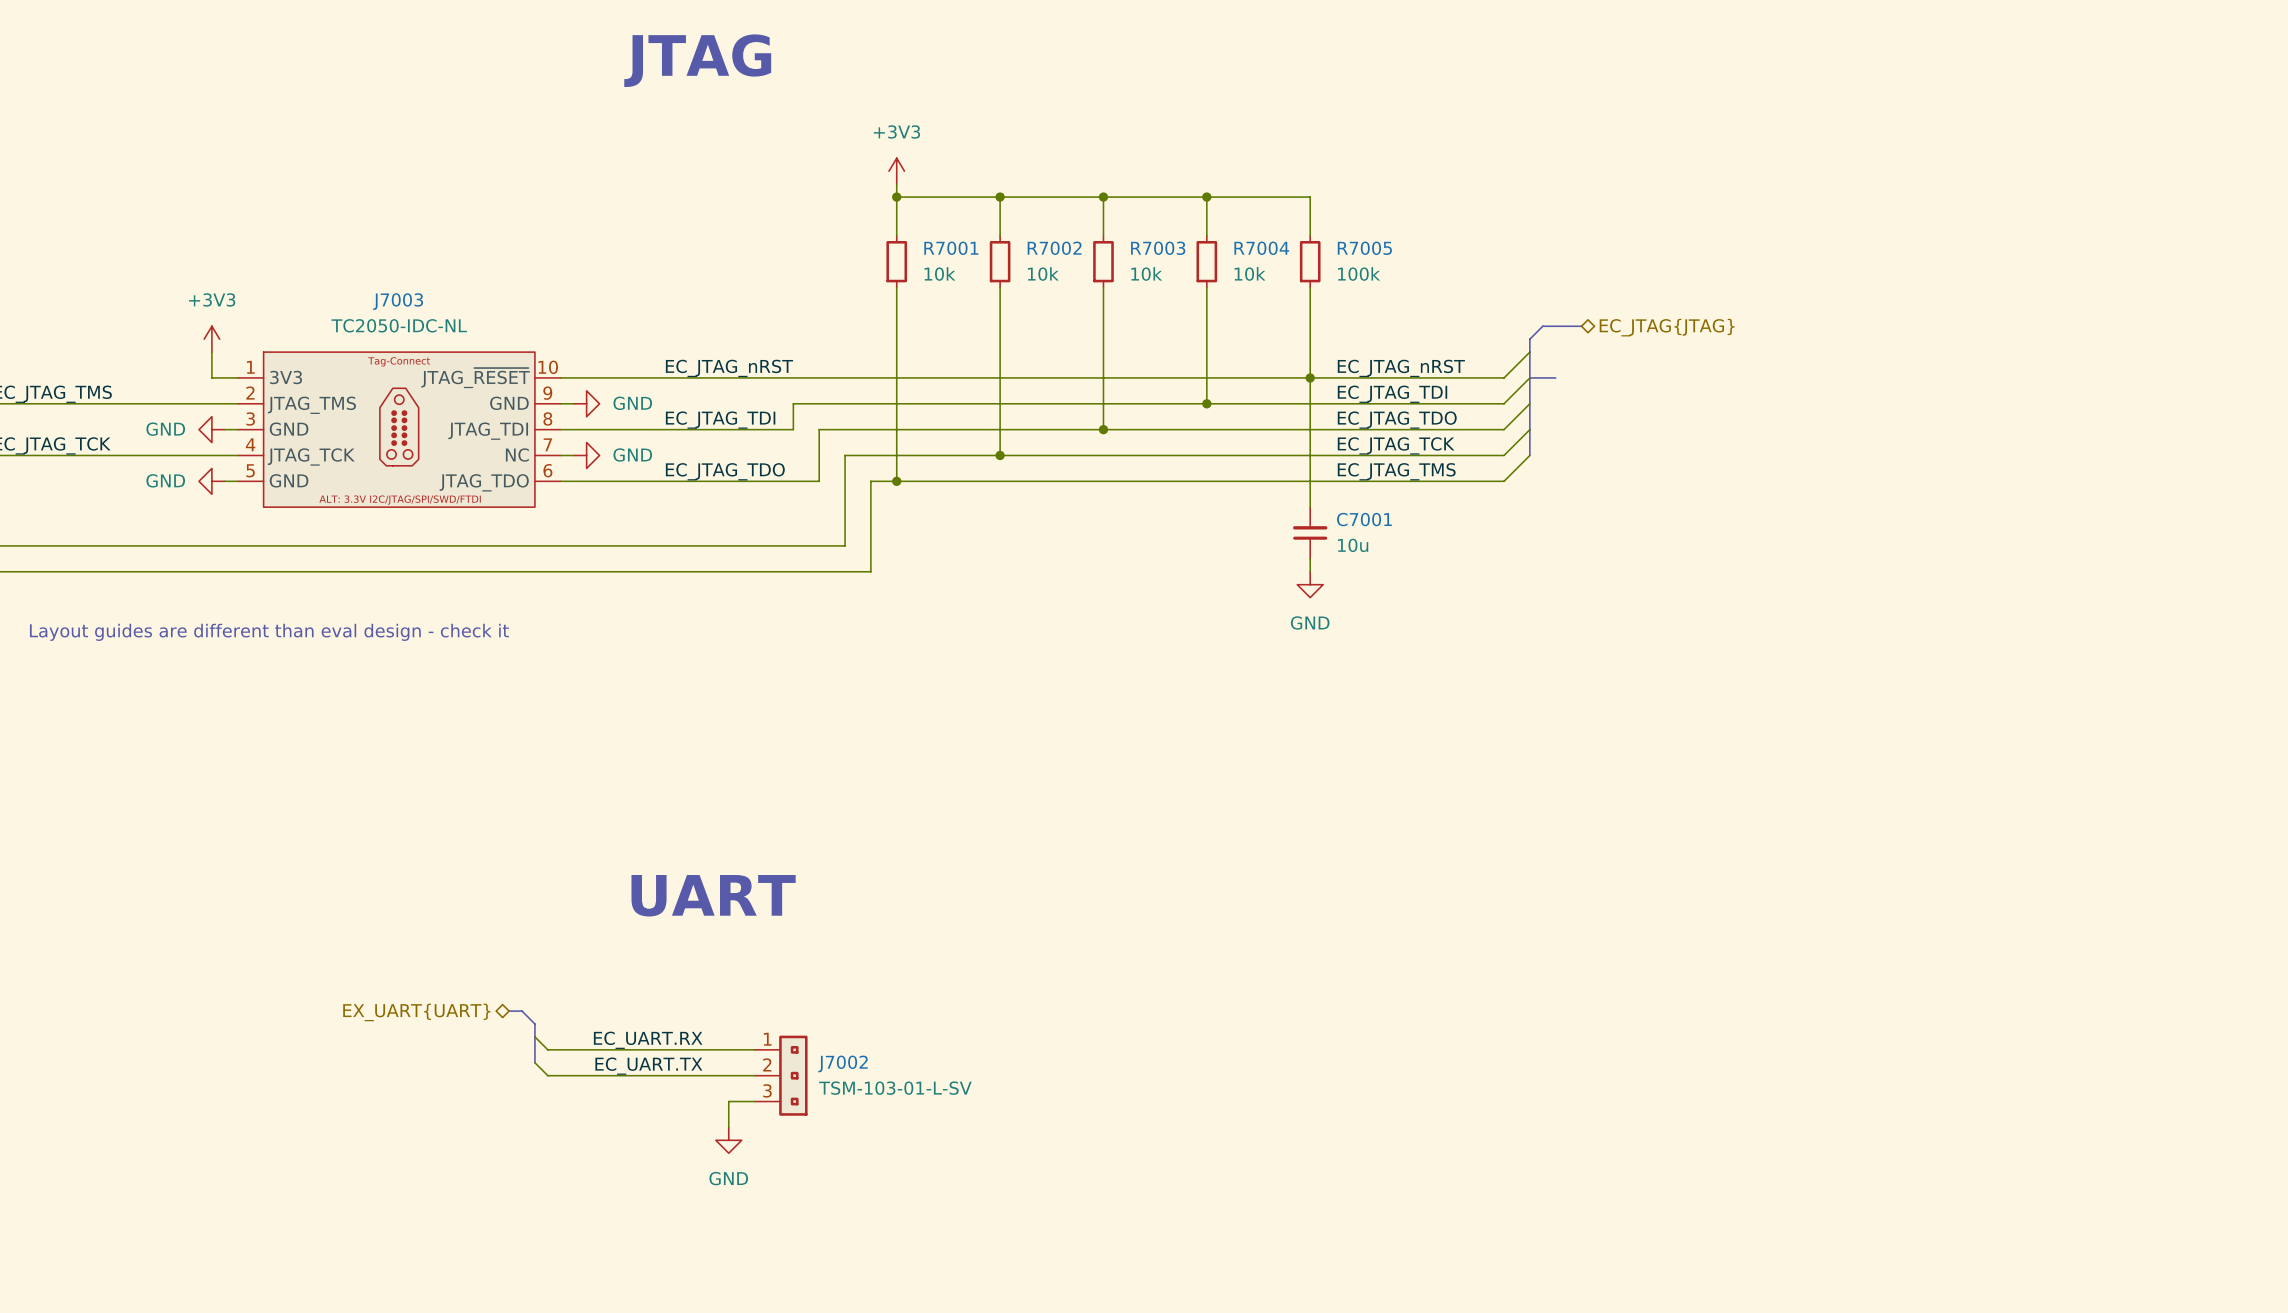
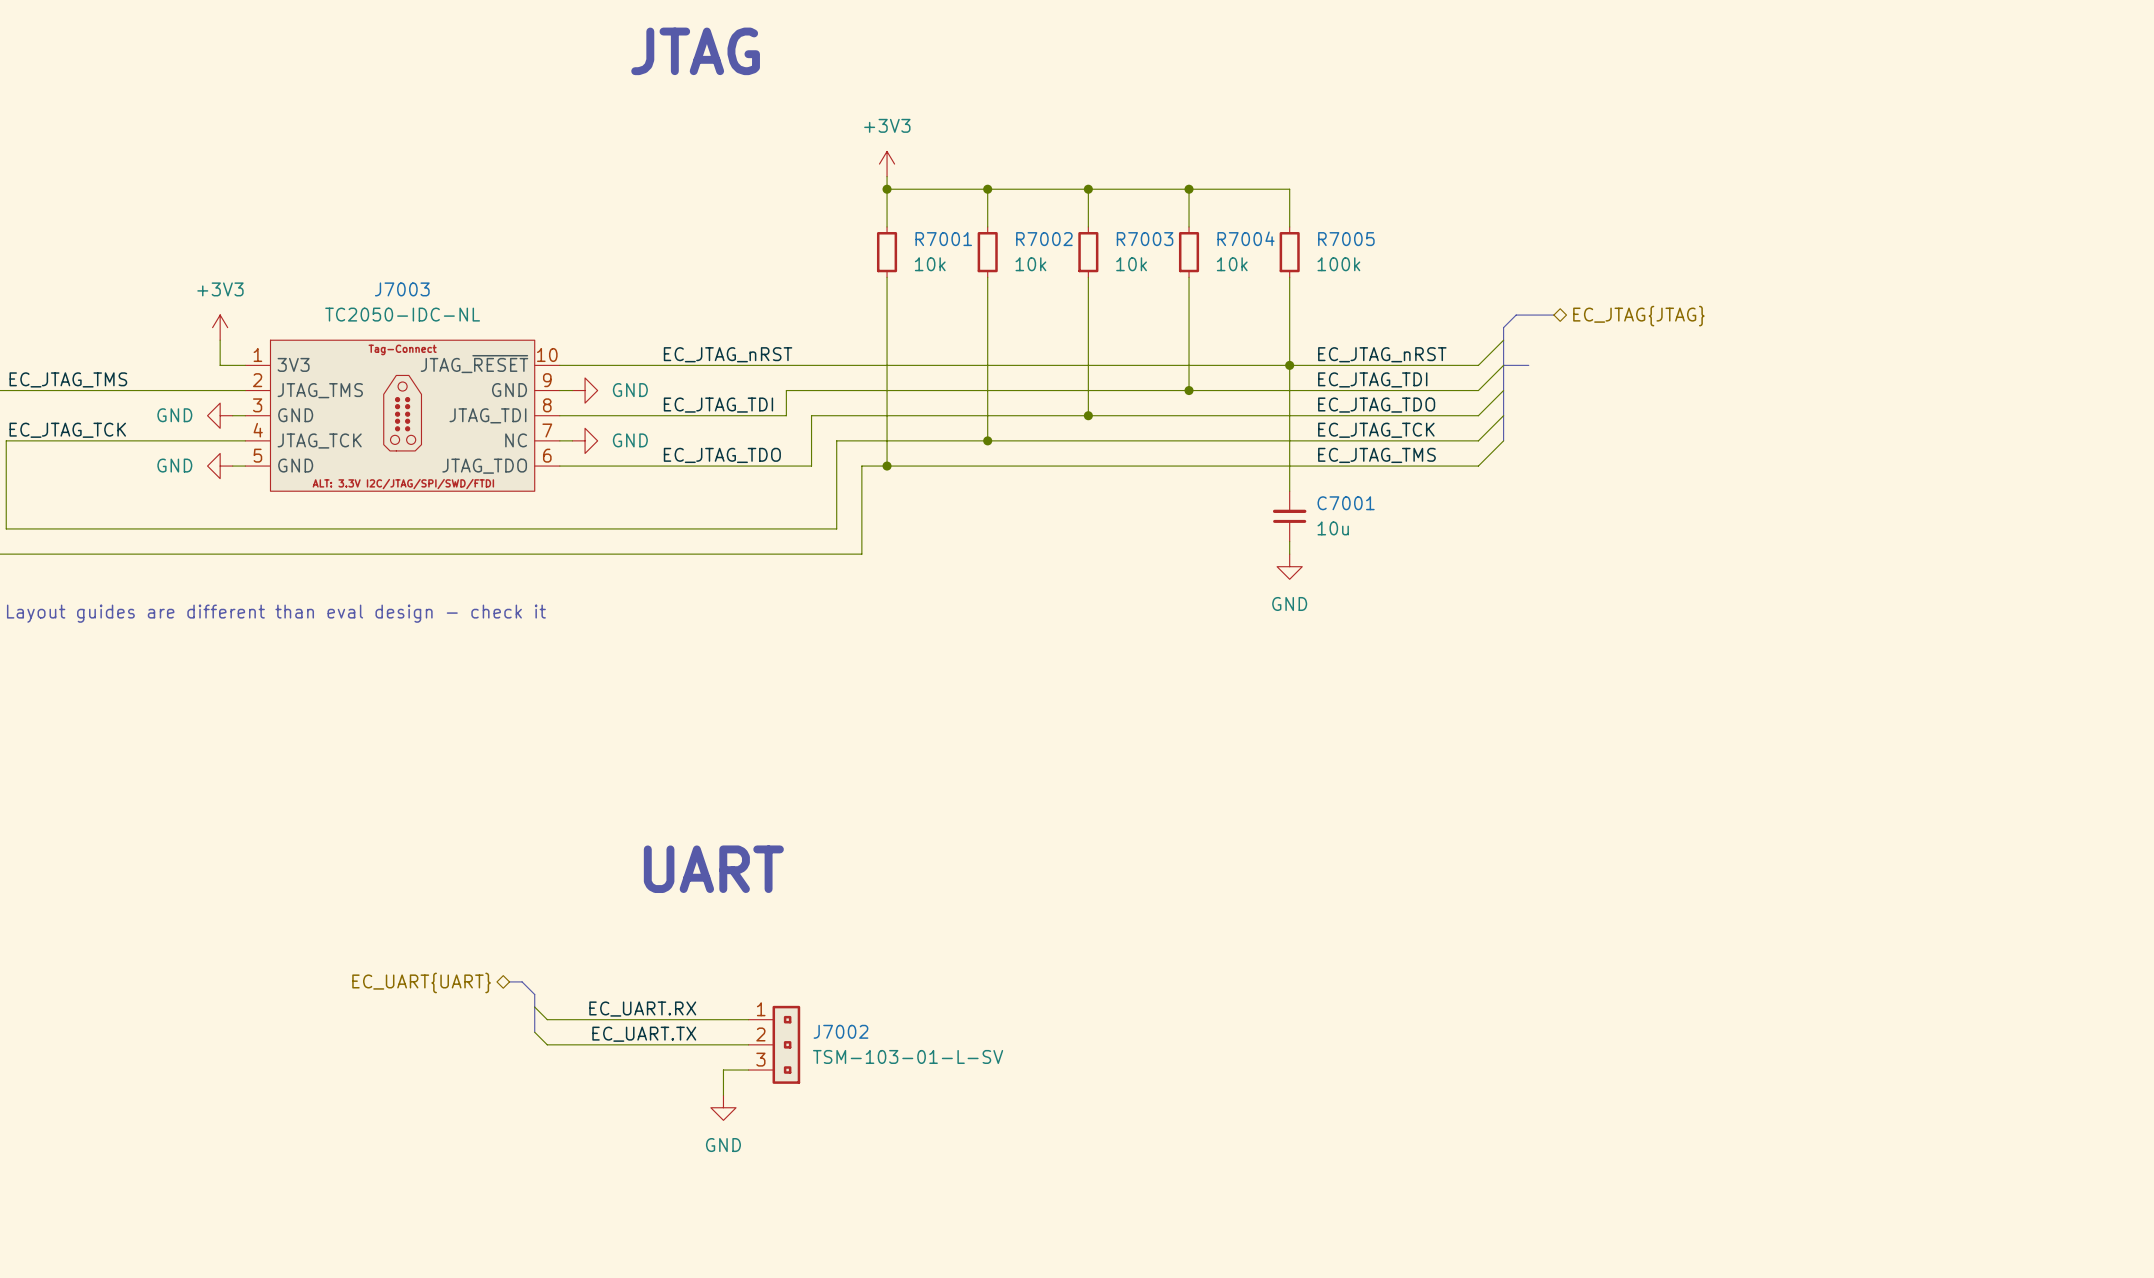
hierarchical label: EX_UART{UART} (416, 1012) -> EC_UART{UART} (421, 982)

